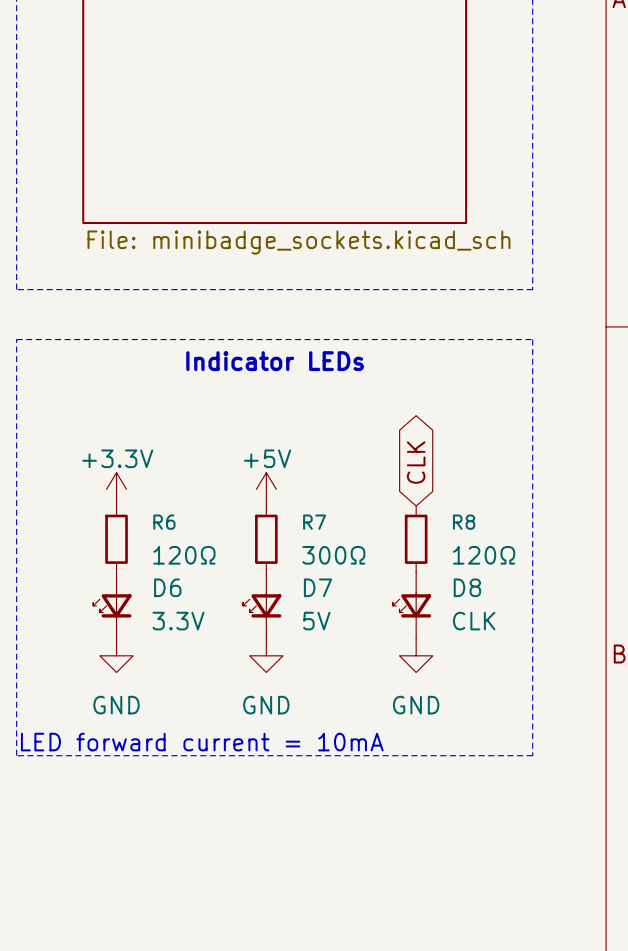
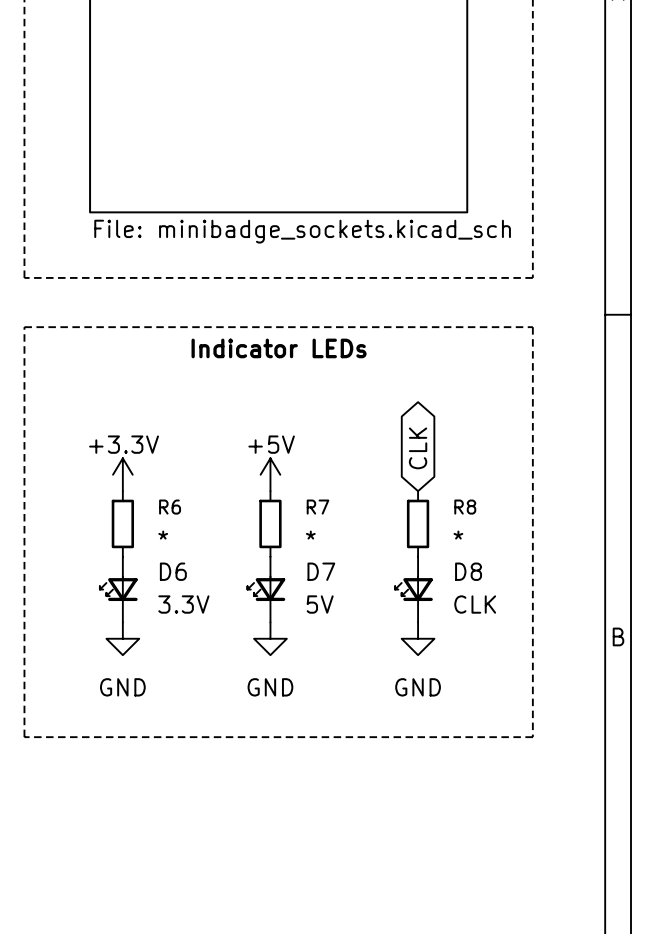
R6 value: 120Ω (184, 555) -> * (163, 535)
R7 value: 300Ω (333, 555) -> * (310, 535)
R8 value: 120Ω (484, 555) -> * (458, 535)
text: LED forward current = 10mA (202, 742) -> none

